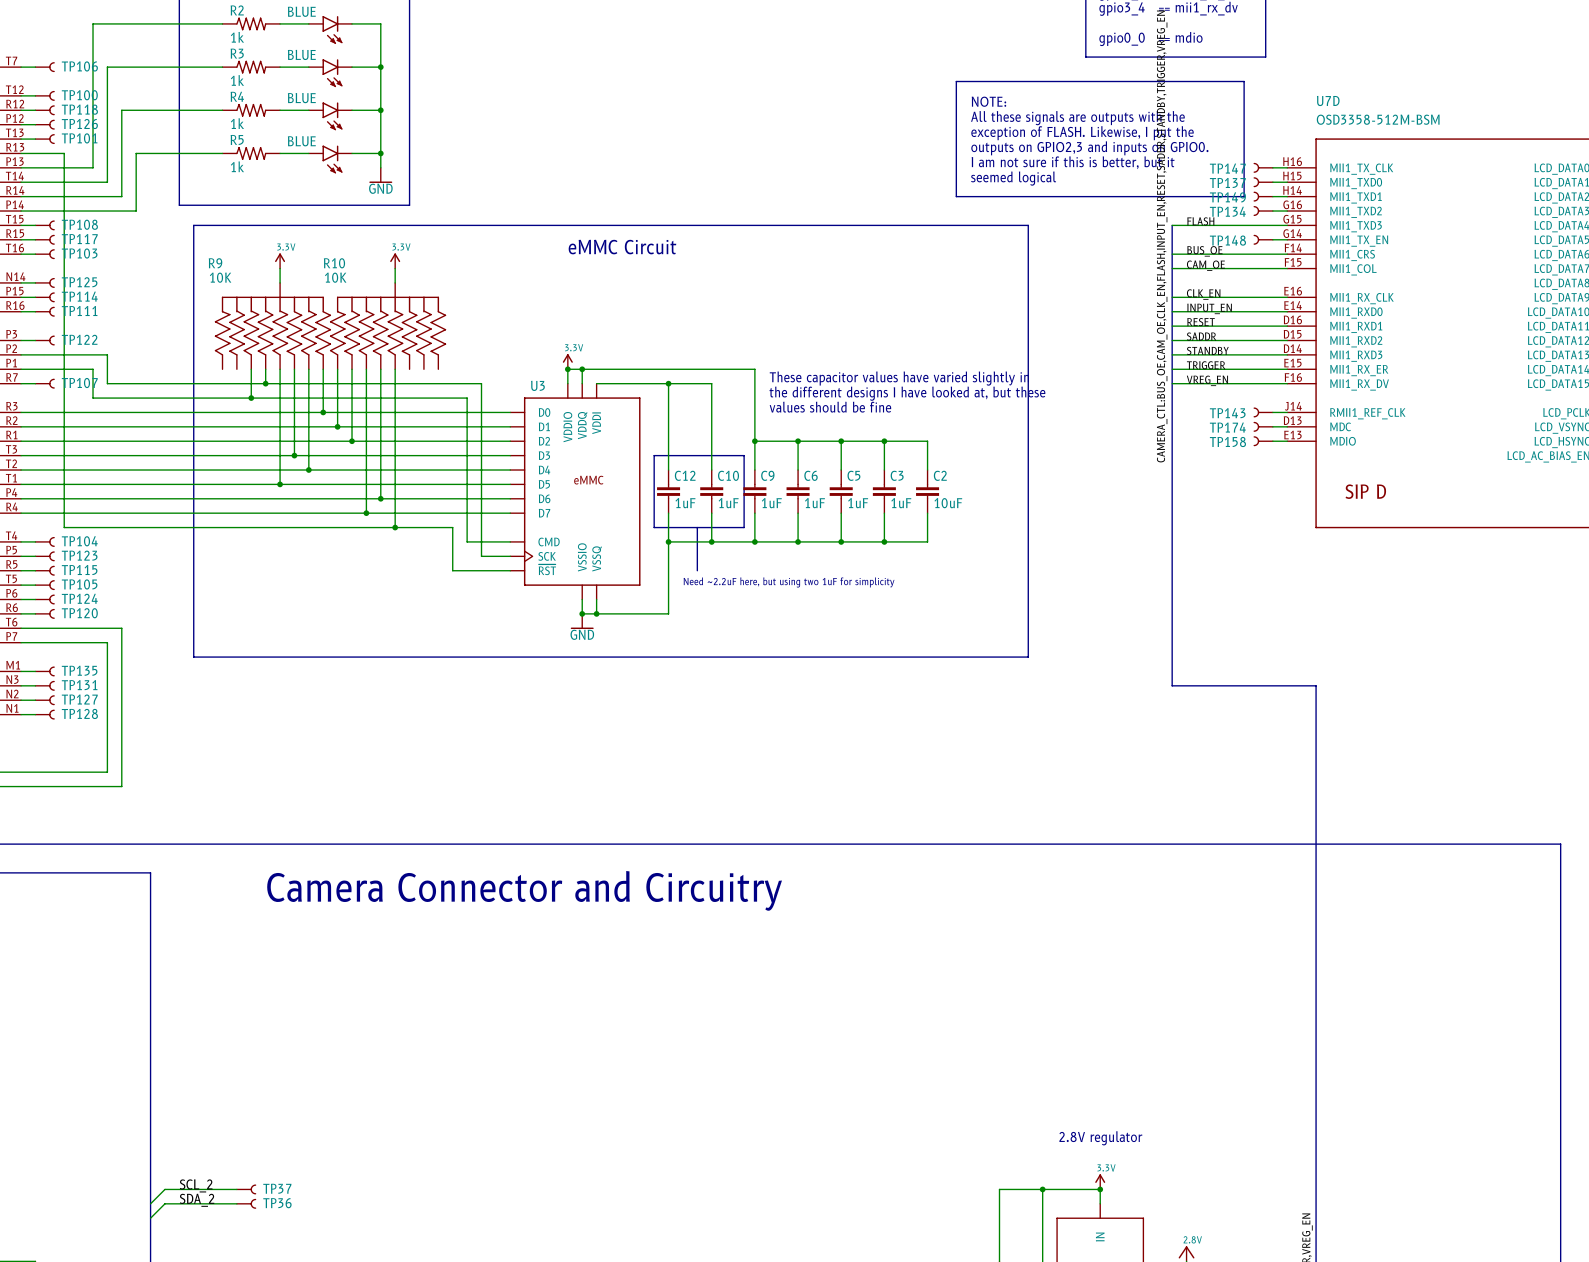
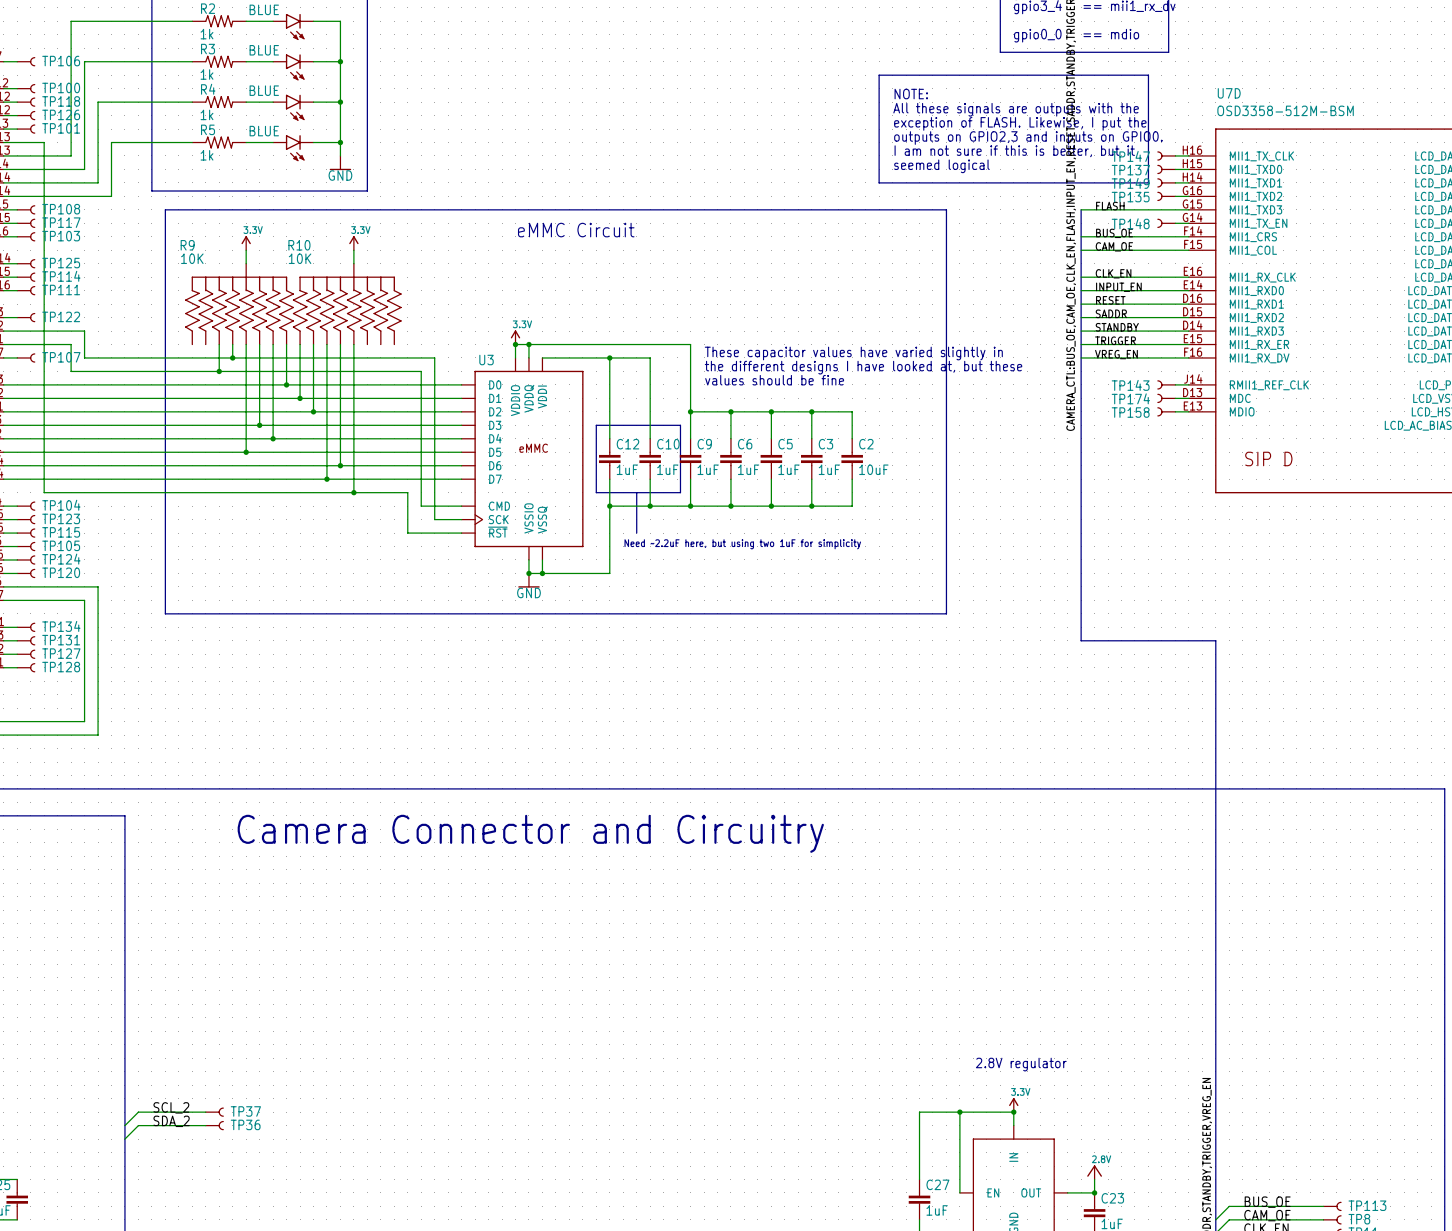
TP134 name: TP134 (1227, 211) -> TP135 (1130, 197)
TP135 name: TP135 (79, 670) -> TP134 (61, 626)

